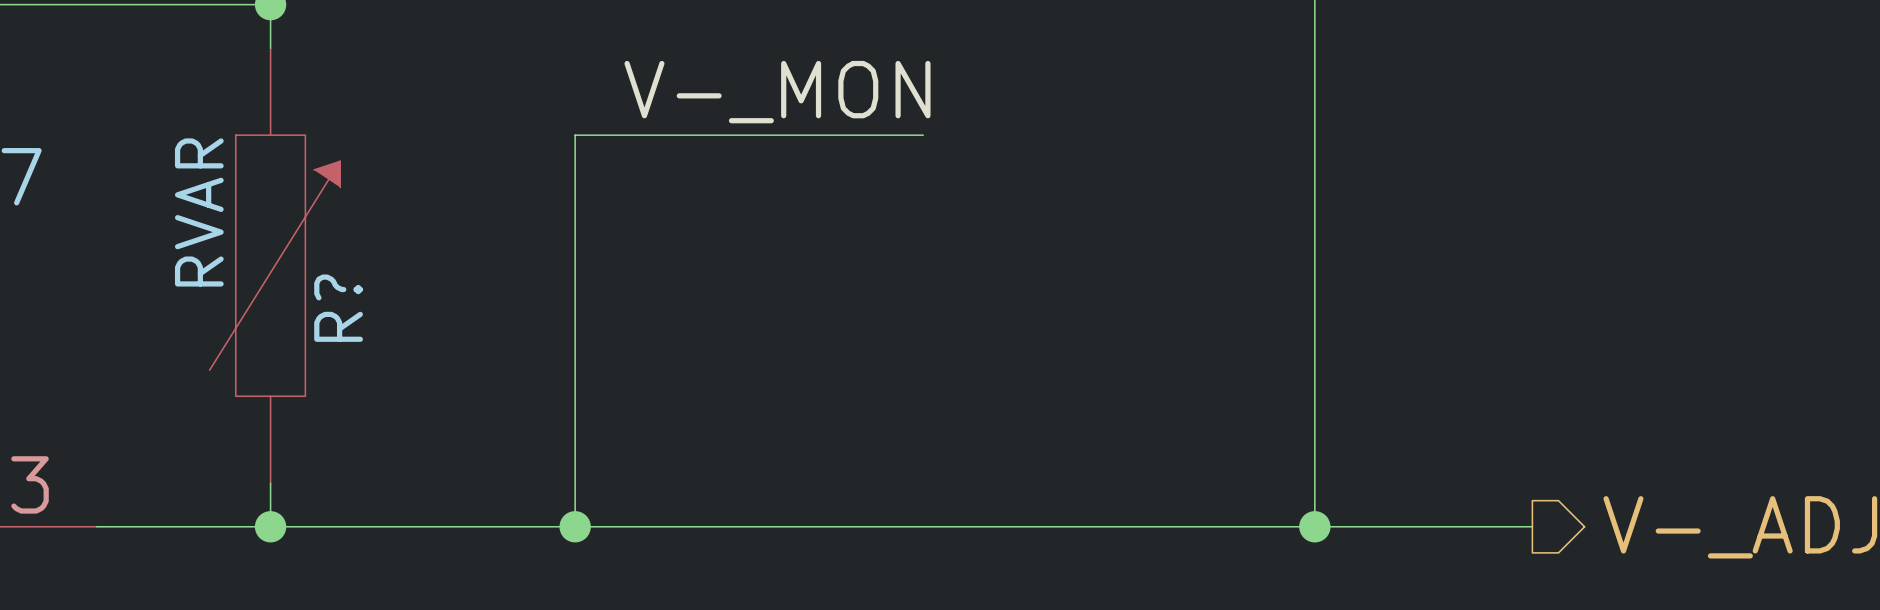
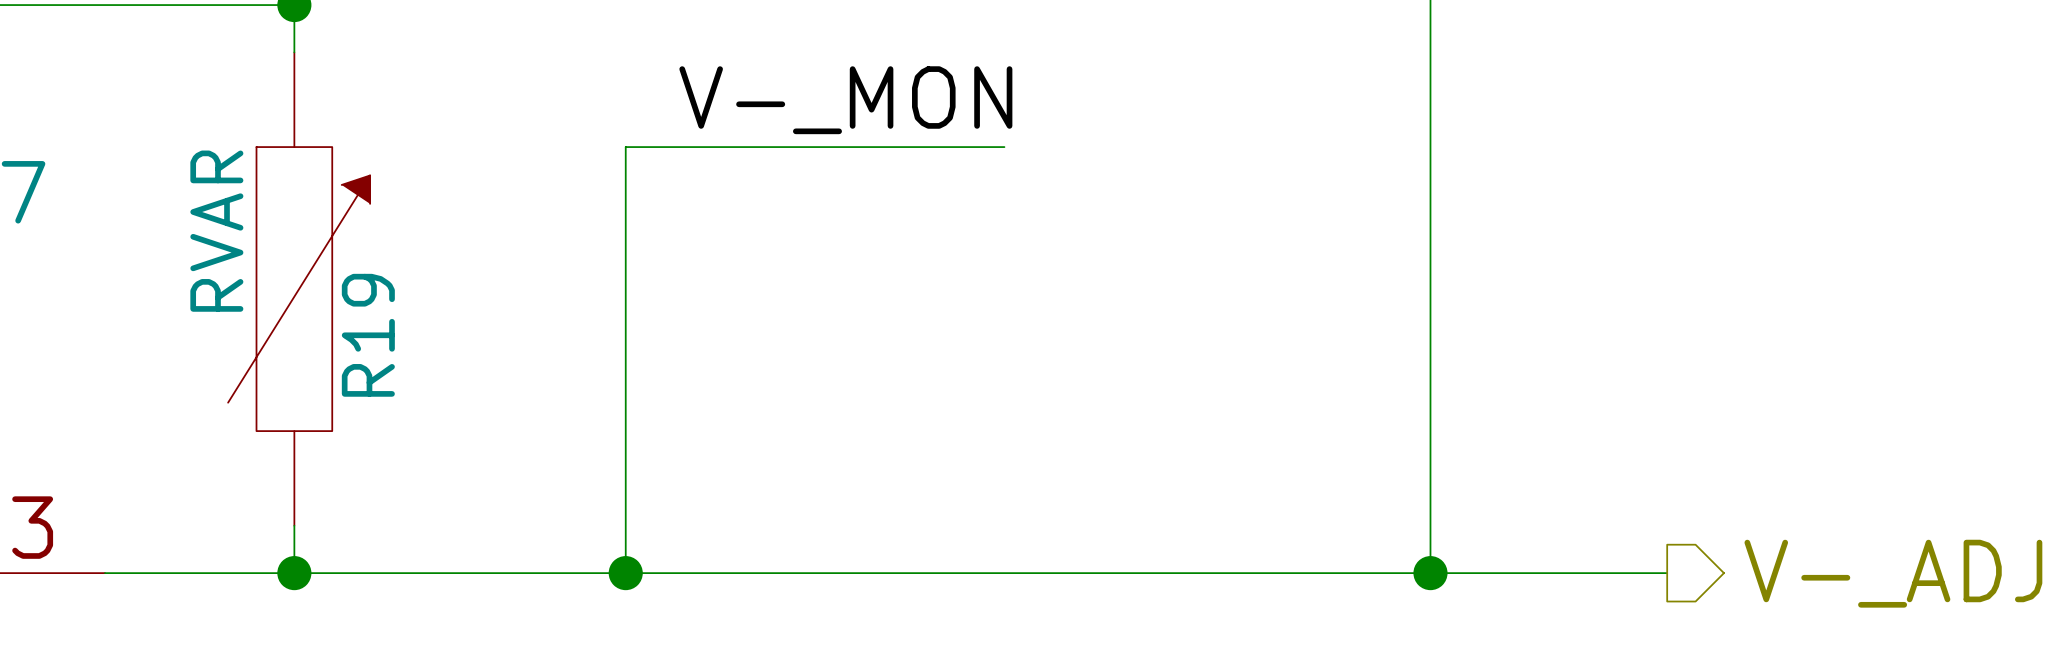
R? name: R? (338, 308) -> R19 (368, 335)

